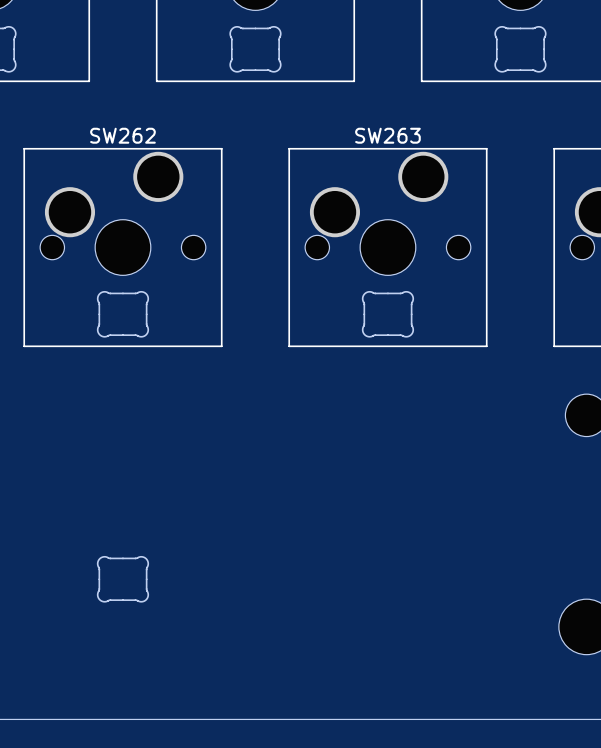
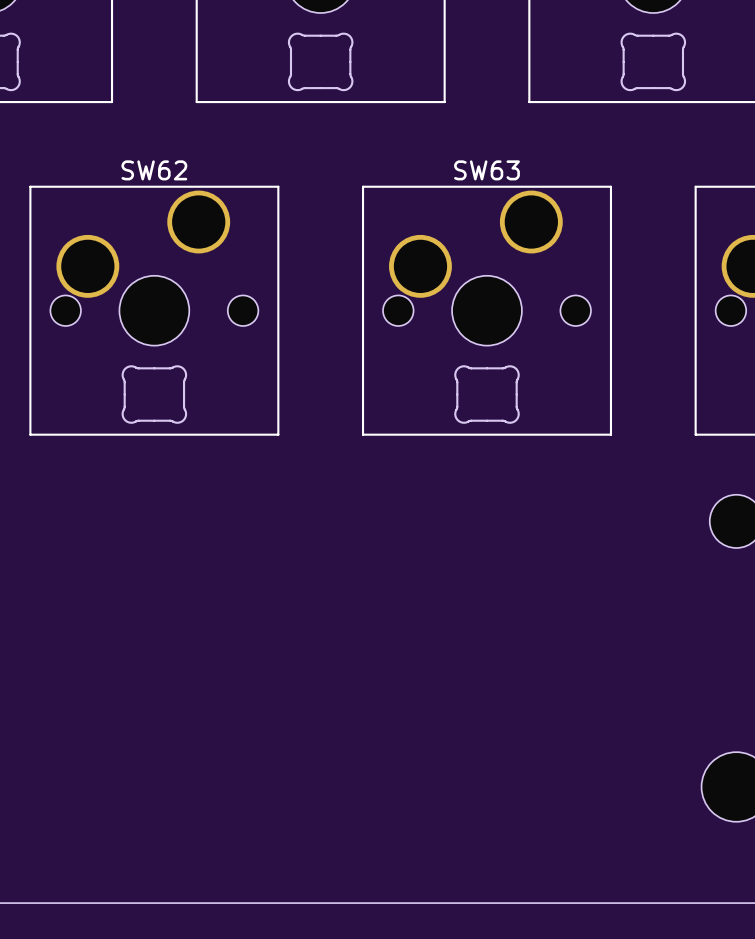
SW262 name: SW262 (122, 135) -> SW62 (154, 170)
SW263 name: SW263 (387, 135) -> SW63 (486, 170)
part: (122, 579) -> none

